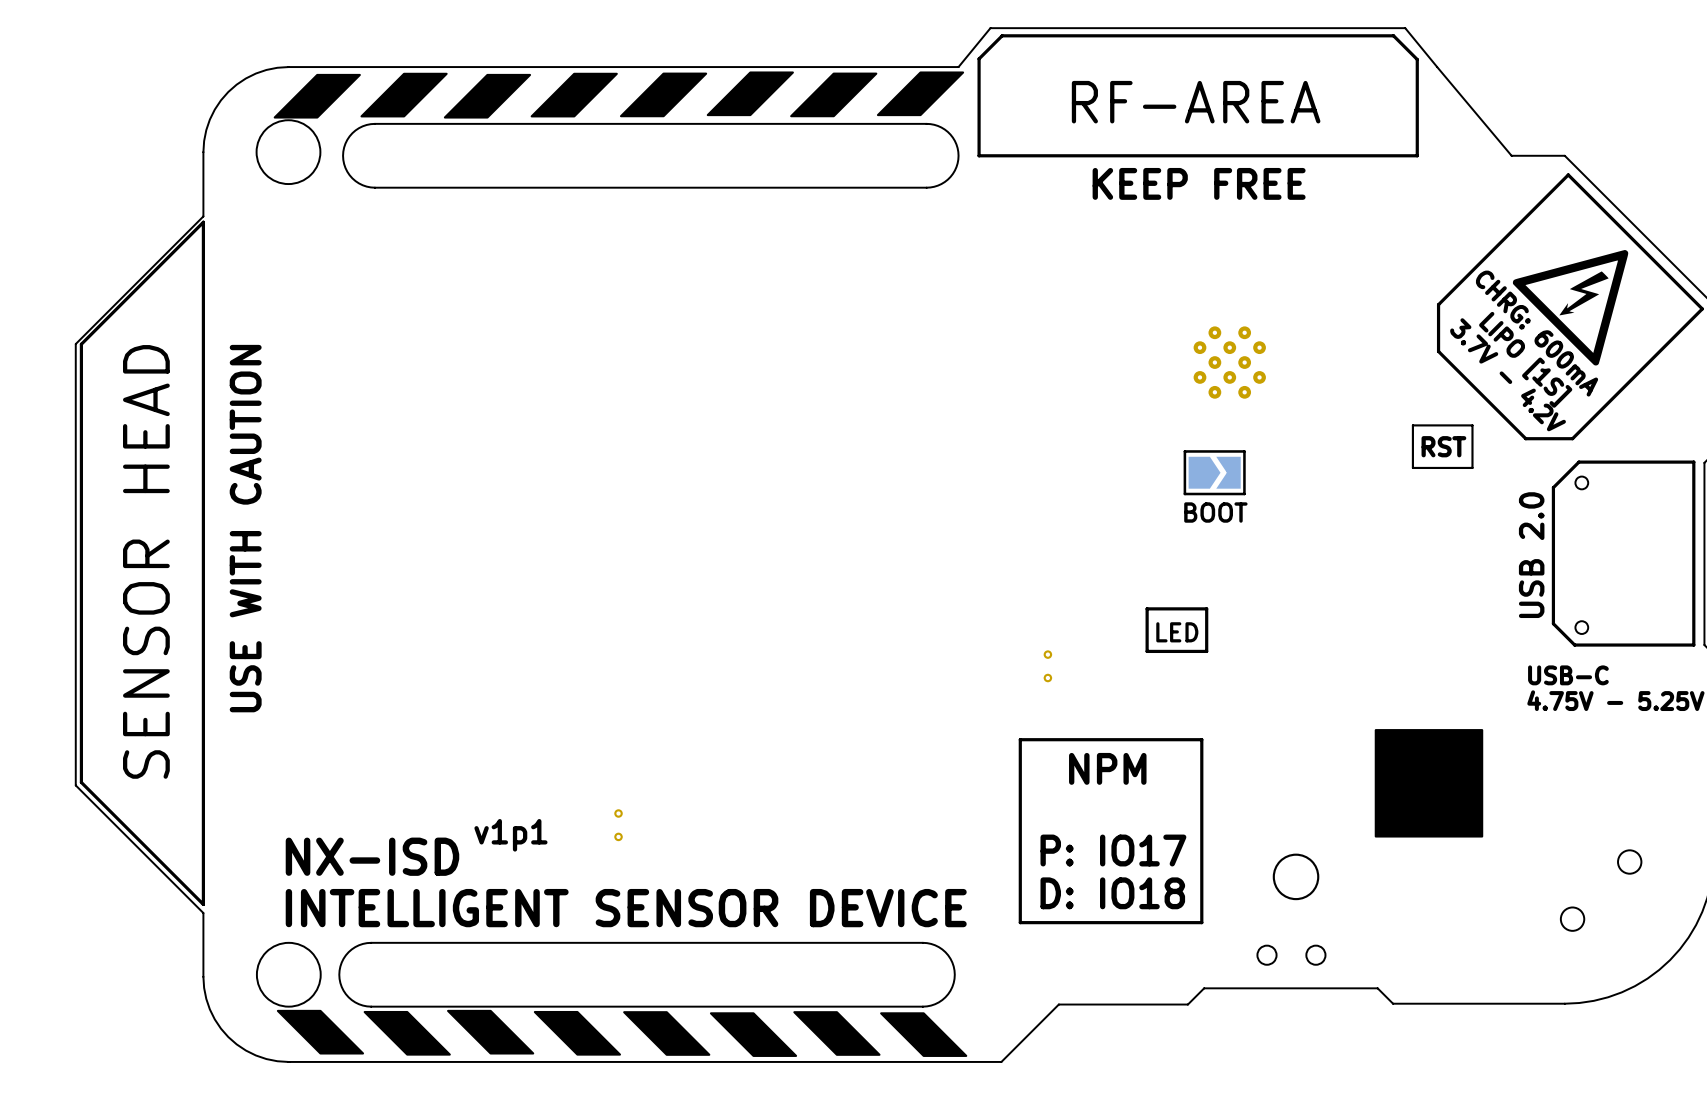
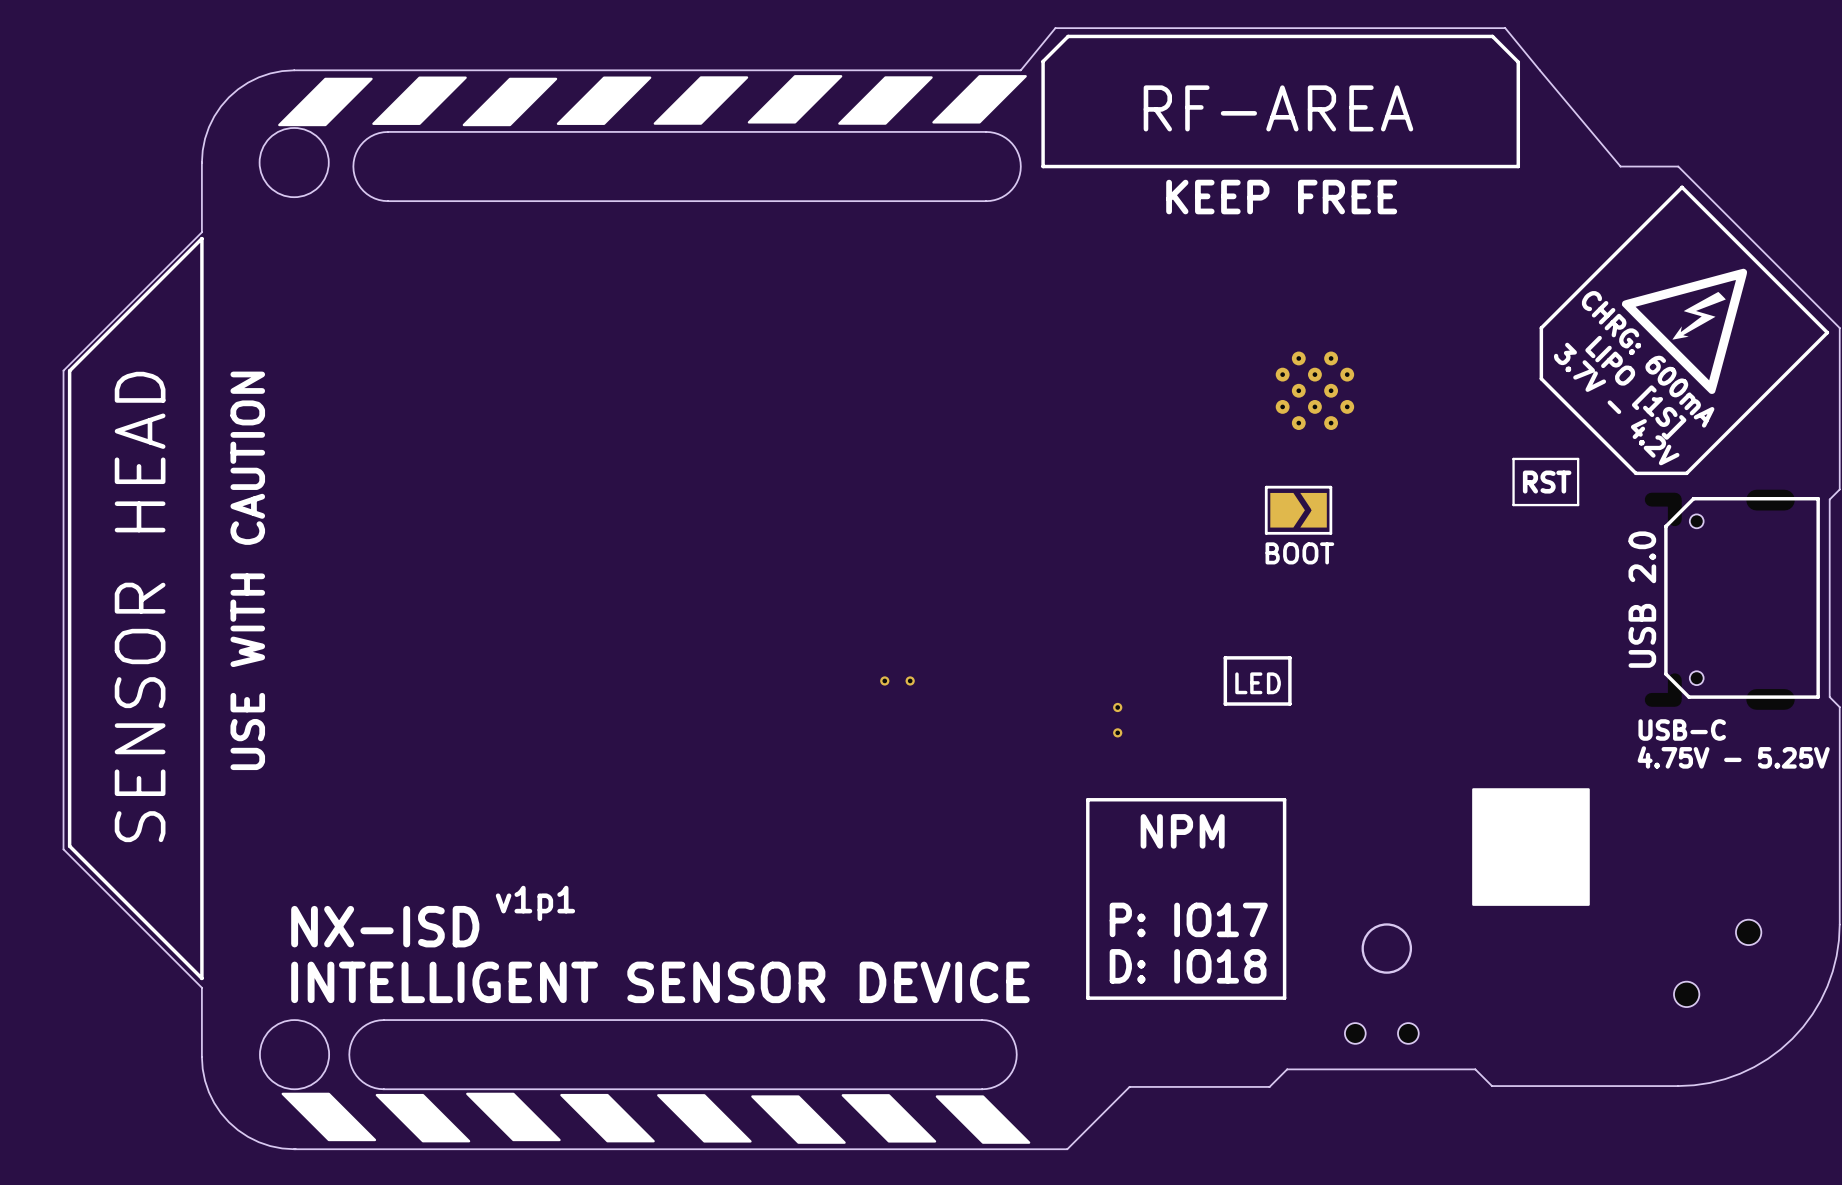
part rotation: 0° (618, 825) -> 90° clockwise (897, 680)
part position: (618, 825) -> (897, 680)

